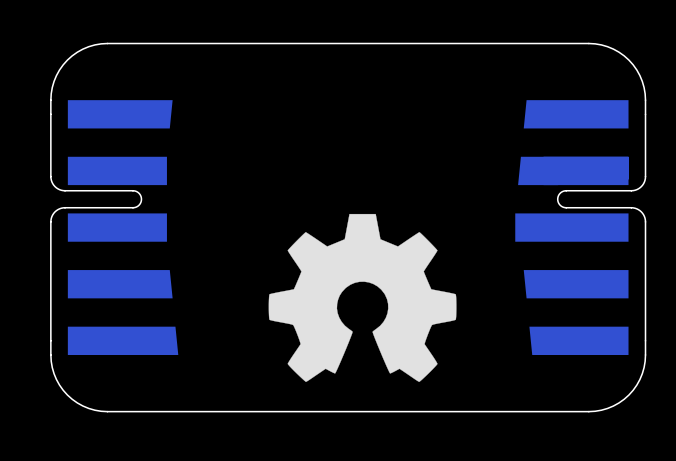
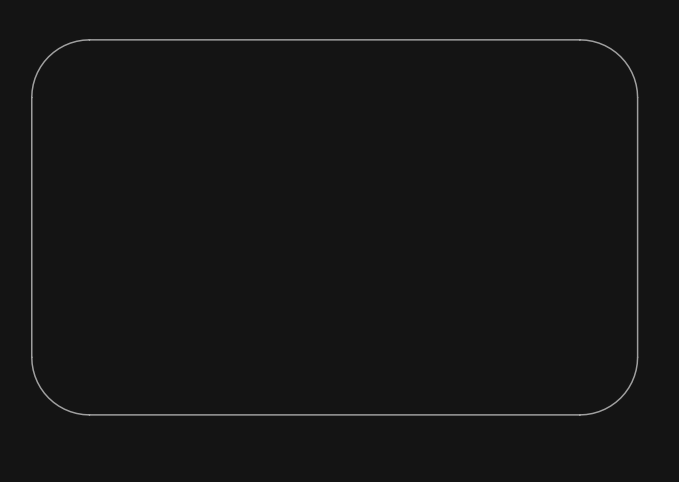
board edge: none -> (31, 111) (31, 342)
board edge: none -> (637, 111) (637, 342)
drawing: [268, 213, 457, 382] -> none
part: (114, 227) -> none
part: (580, 227) -> none

